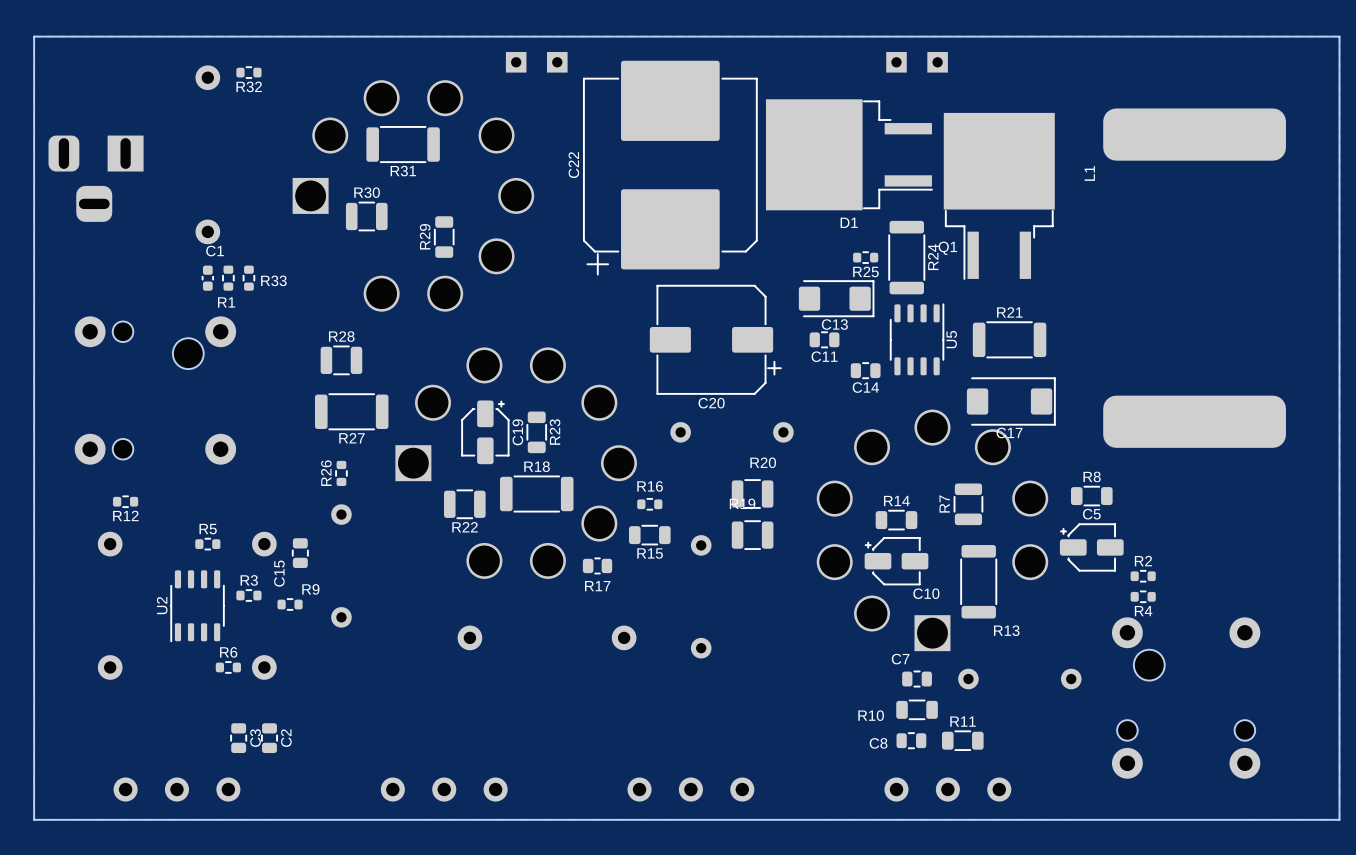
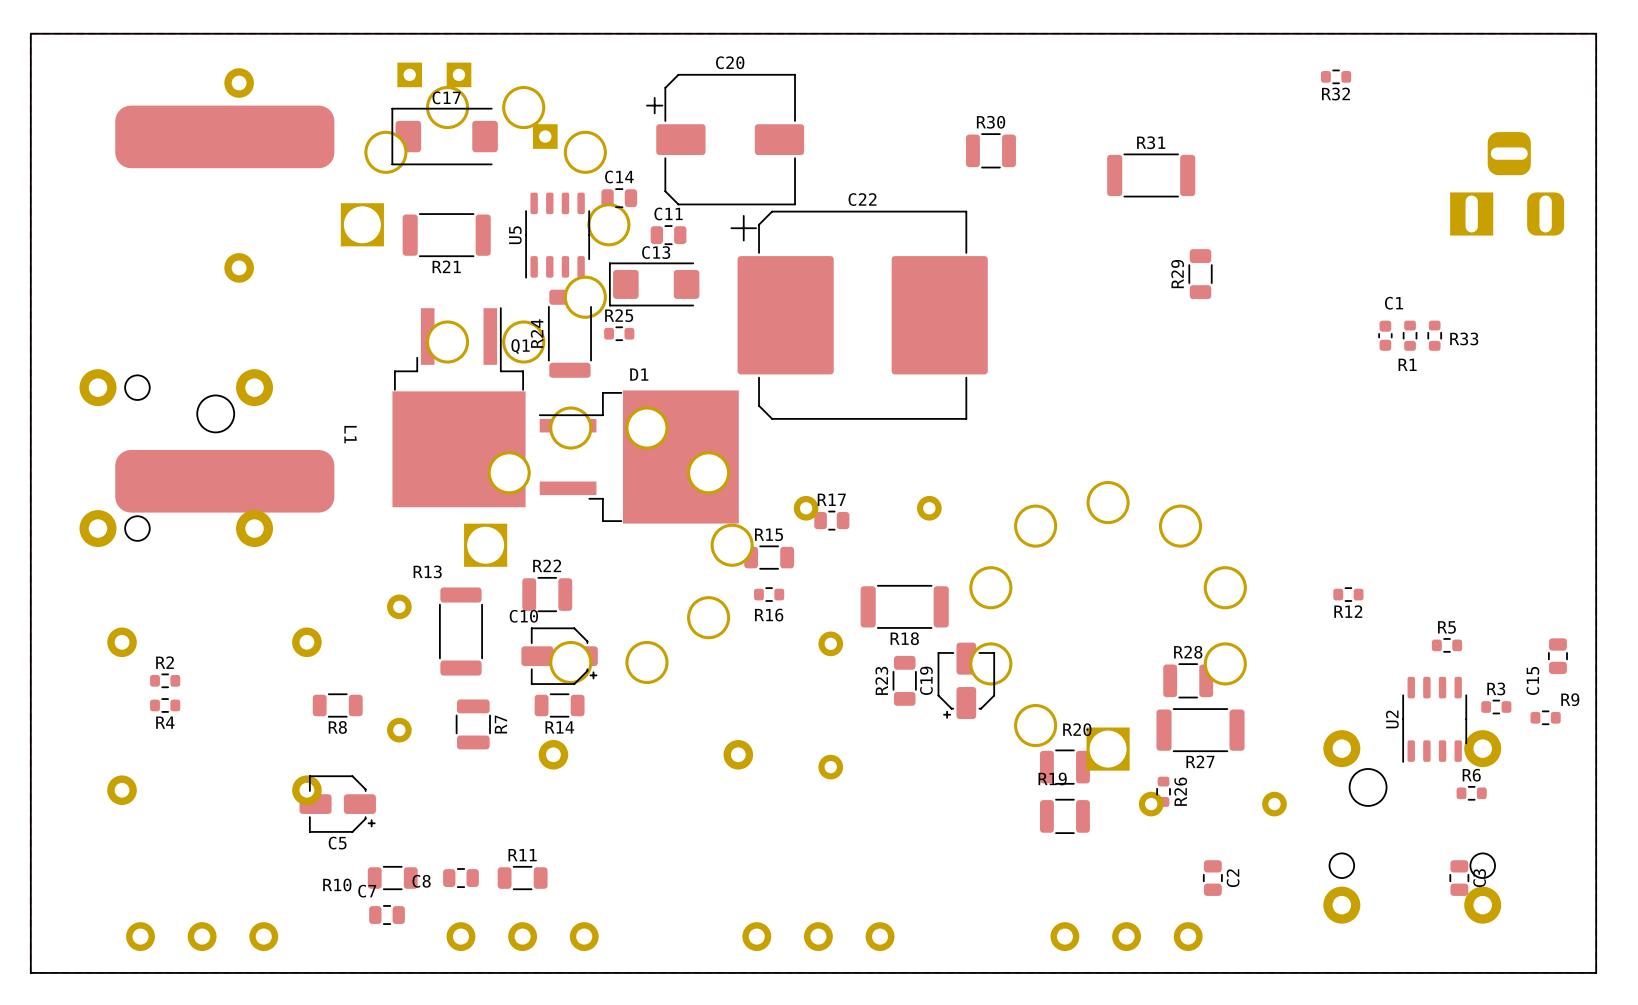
part: (516, 62) -> none
part: (557, 62) -> none
part: (896, 62) -> none
part: (937, 62) -> none
part: none -> (409, 74)
part: none -> (459, 74)
R32 position: (248, 72) -> (1336, 76)
part: none -> (545, 136)
R31 position: (403, 144) -> (1151, 175)
D1 rotation: 0° (849, 154) -> 180° (638, 456)
D1 position: (849, 154) -> (638, 456)
part: none -> (1507, 183)
C22 rotation: 0° (670, 167) -> 90° clockwise (859, 315)
R31 name position: R31 (403, 171) -> R31 (1151, 142)
L1 name rotation: 0° (1089, 173) -> 180° (350, 434)
L1 name position: L1 (1089, 173) -> L1 (350, 434)
part: (96, 178) -> none
Q1 rotation: 0° (999, 196) -> 180° (459, 407)
Q1 position: (999, 196) -> (459, 407)
R30 position: (366, 216) -> (990, 150)
R29 position: (444, 237) -> (1200, 274)
R25 position: (865, 257) -> (619, 333)
R24 position: (906, 257) -> (569, 333)
R24 name position: R24 (933, 257) -> R24 (537, 333)
R25 name position: R25 (865, 271) -> R25 (619, 315)
C1 position: (207, 278) -> (1385, 335)
R1 position: (228, 278) -> (1410, 335)
R33 position: (248, 278) -> (1434, 335)
L1 position: (1194, 278) -> (224, 309)
C13 rotation: 0° (836, 298) -> 180° (654, 284)
C13 position: (836, 298) -> (654, 284)
R21 name position: R21 (1009, 312) -> R21 (446, 266)
C20 rotation: 0° (715, 339) -> 180° (725, 139)
C20 position: (715, 339) -> (725, 139)
C11 position: (824, 339) -> (668, 235)
U5 rotation: 0° (917, 339) -> 180° (557, 235)
U5 position: (917, 339) -> (557, 235)
R21 position: (1009, 339) -> (446, 235)
C11 name position: C11 (824, 356) -> C11 (668, 213)
R28 position: (341, 360) -> (1188, 680)
C14 position: (865, 370) -> (619, 198)
C14 name position: C14 (865, 387) -> C14 (619, 177)
C17 rotation: 0° (1011, 401) -> 180° (444, 136)
C17 position: (1011, 401) -> (444, 136)
R27 position: (351, 411) -> (1200, 730)
C19 rotation: 0° (485, 432) -> 180° (966, 680)
C19 position: (485, 432) -> (966, 680)
R23 position: (536, 432) -> (904, 680)
R23 name position: R23 (555, 432) -> R23 (881, 680)
R18 name position: R18 (537, 466) -> R18 (904, 638)
R26 name position: R26 (326, 473) -> R26 (1180, 791)
R26 position: (341, 473) -> (1163, 791)
R8 name position: R8 (1092, 476) -> R8 (337, 727)
R16 name position: R16 (650, 486) -> R16 (769, 615)
R18 position: (536, 494) -> (904, 606)
R20 position: (752, 494) -> (1064, 767)
R8 position: (1091, 496) -> (337, 705)
R12 position: (125, 501) -> (1348, 594)
R14 name position: R14 (896, 501) -> R14 (559, 727)
R7 name position: R7 (944, 504) -> R7 (500, 724)
R7 position: (968, 504) -> (473, 724)
R14 position: (896, 520) -> (559, 705)
R22 name position: R22 (465, 527) -> R22 (547, 565)
R15 position: (649, 535) -> (769, 557)
R19 position: (752, 535) -> (1064, 816)
R5 position: (207, 544) -> (1447, 645)
C5 rotation: 0° (1091, 547) -> 180° (337, 804)
C5 position: (1091, 547) -> (337, 804)
C15 position: (300, 553) -> (1557, 656)
R15 name position: R15 (650, 553) -> R15 (769, 534)
C10 rotation: 0° (896, 561) -> 180° (559, 656)
C10 position: (896, 561) -> (559, 656)
R17 position: (597, 565) -> (831, 520)
R2 position: (1143, 576) -> (165, 680)
R13 position: (978, 581) -> (460, 631)
R17 name position: R17 (597, 586) -> R17 (831, 499)
R3 position: (248, 595) -> (1496, 707)
R4 position: (1143, 596) -> (165, 705)
R9 position: (290, 604) -> (1545, 717)
U2 position: (197, 606) -> (1434, 719)
R13 name position: R13 (1006, 630) -> R13 (427, 571)
R6 position: (228, 667) -> (1471, 793)
C7 position: (917, 679) -> (387, 915)
R10 position: (917, 709) -> (392, 878)
C3 position: (238, 738) -> (1459, 878)
C2 position: (269, 738) -> (1212, 878)
C8 position: (911, 740) -> (460, 878)
R11 position: (962, 740) -> (522, 878)

